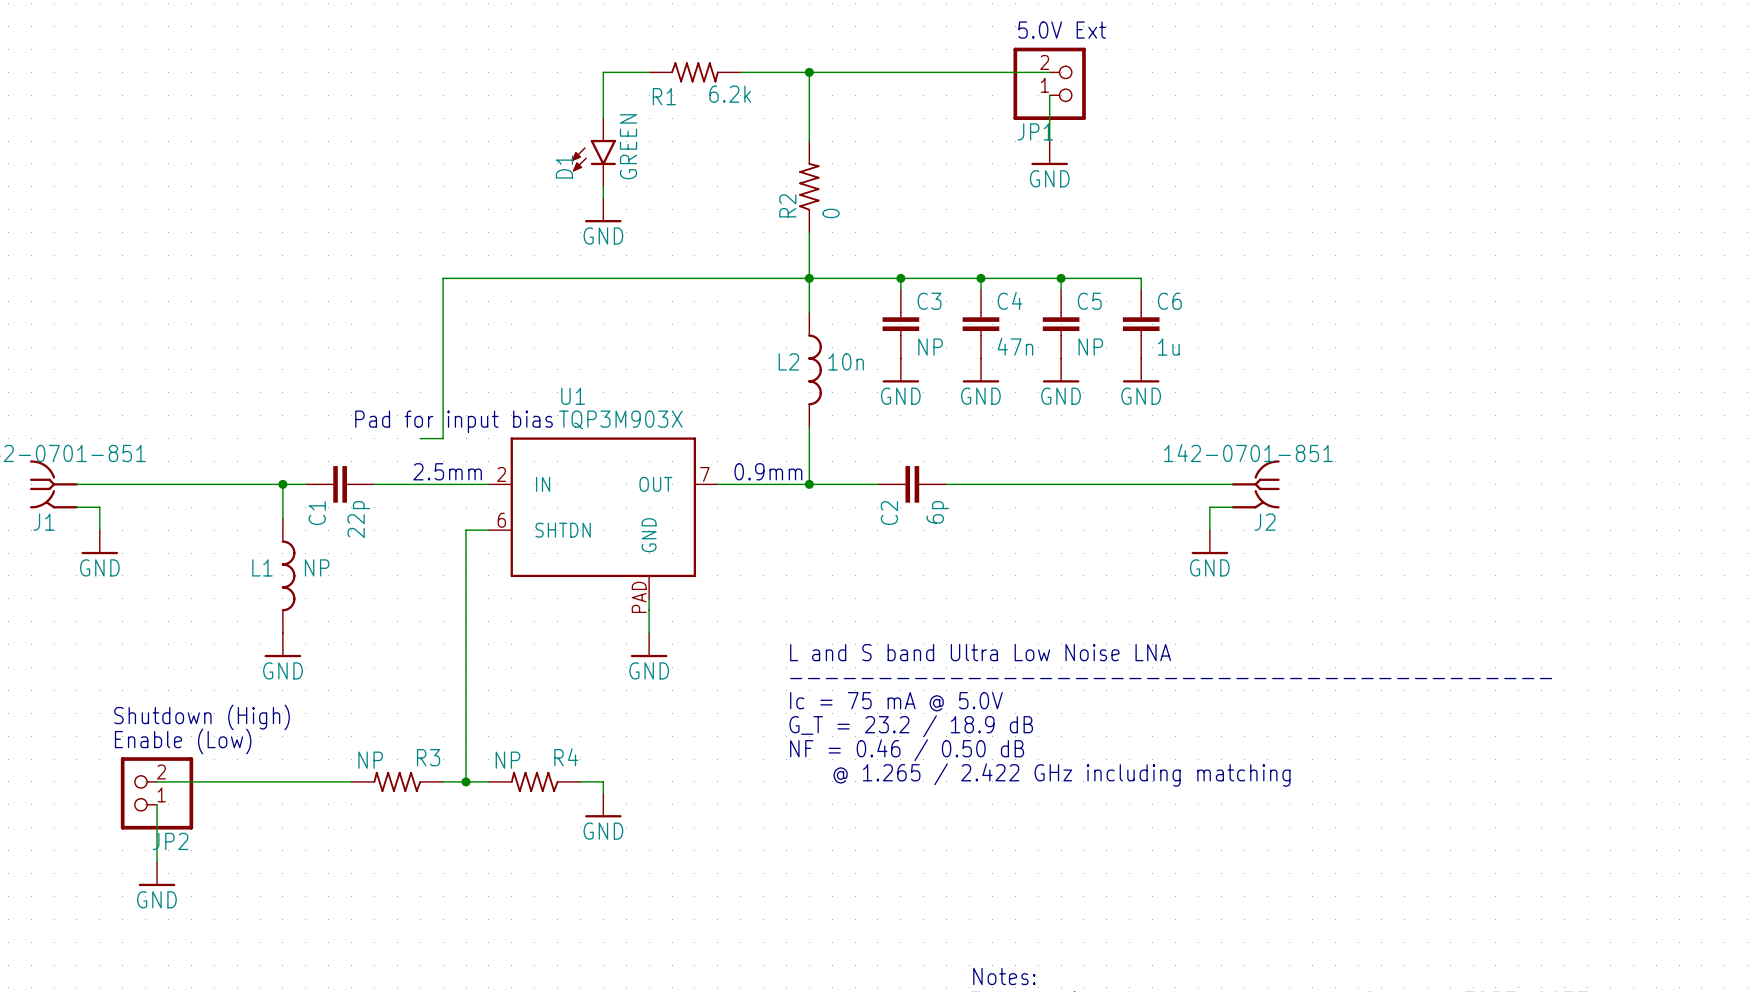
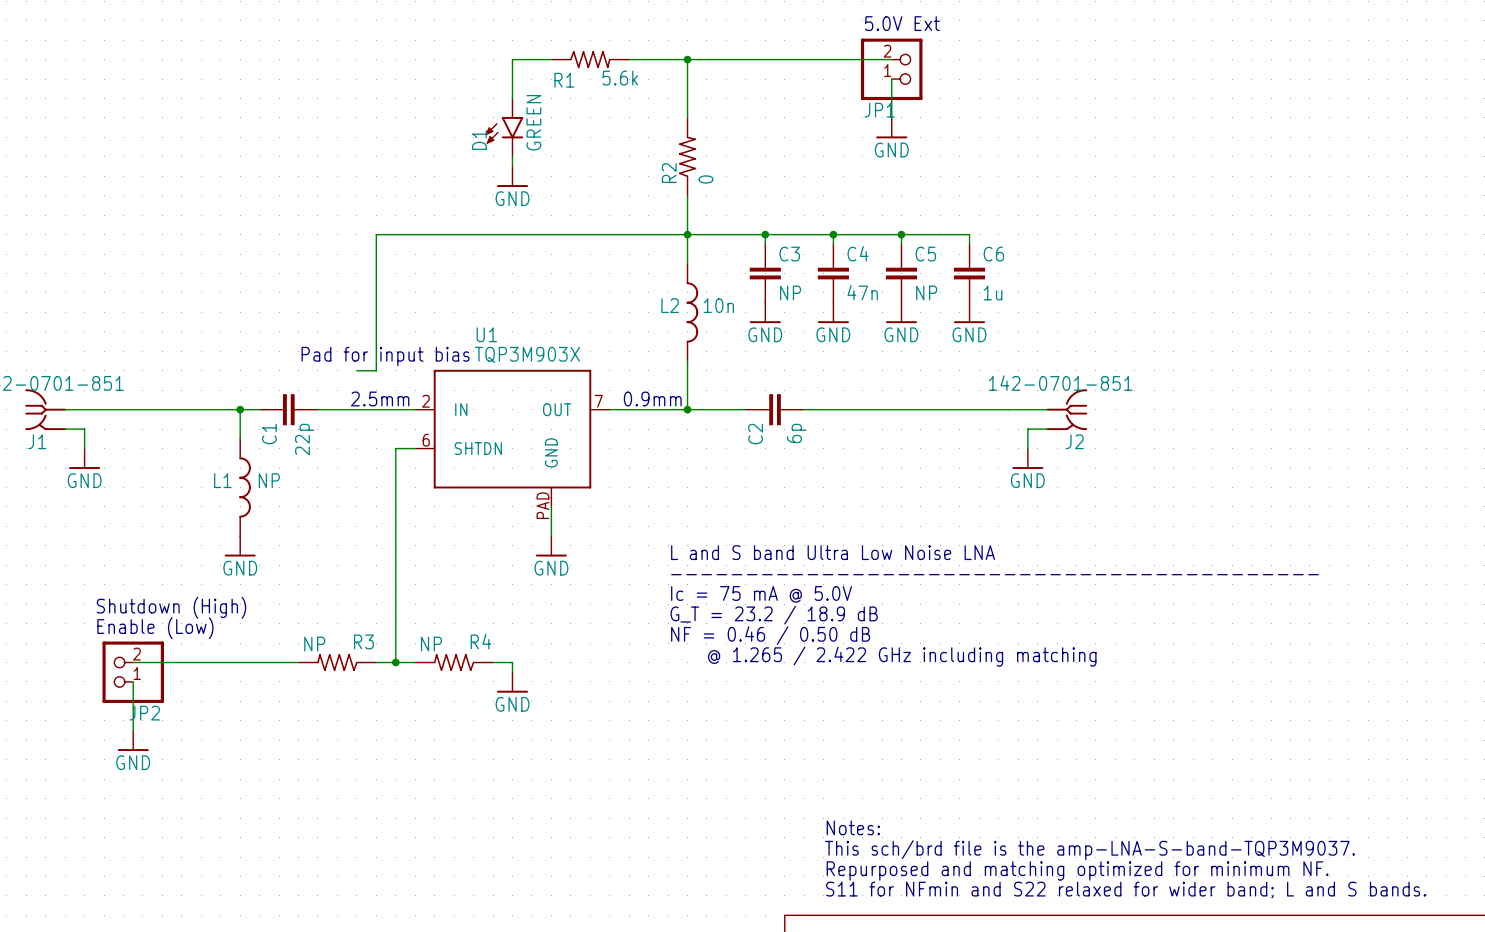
R1 value: 6.2k (730, 94) -> 5.6k (620, 78)

